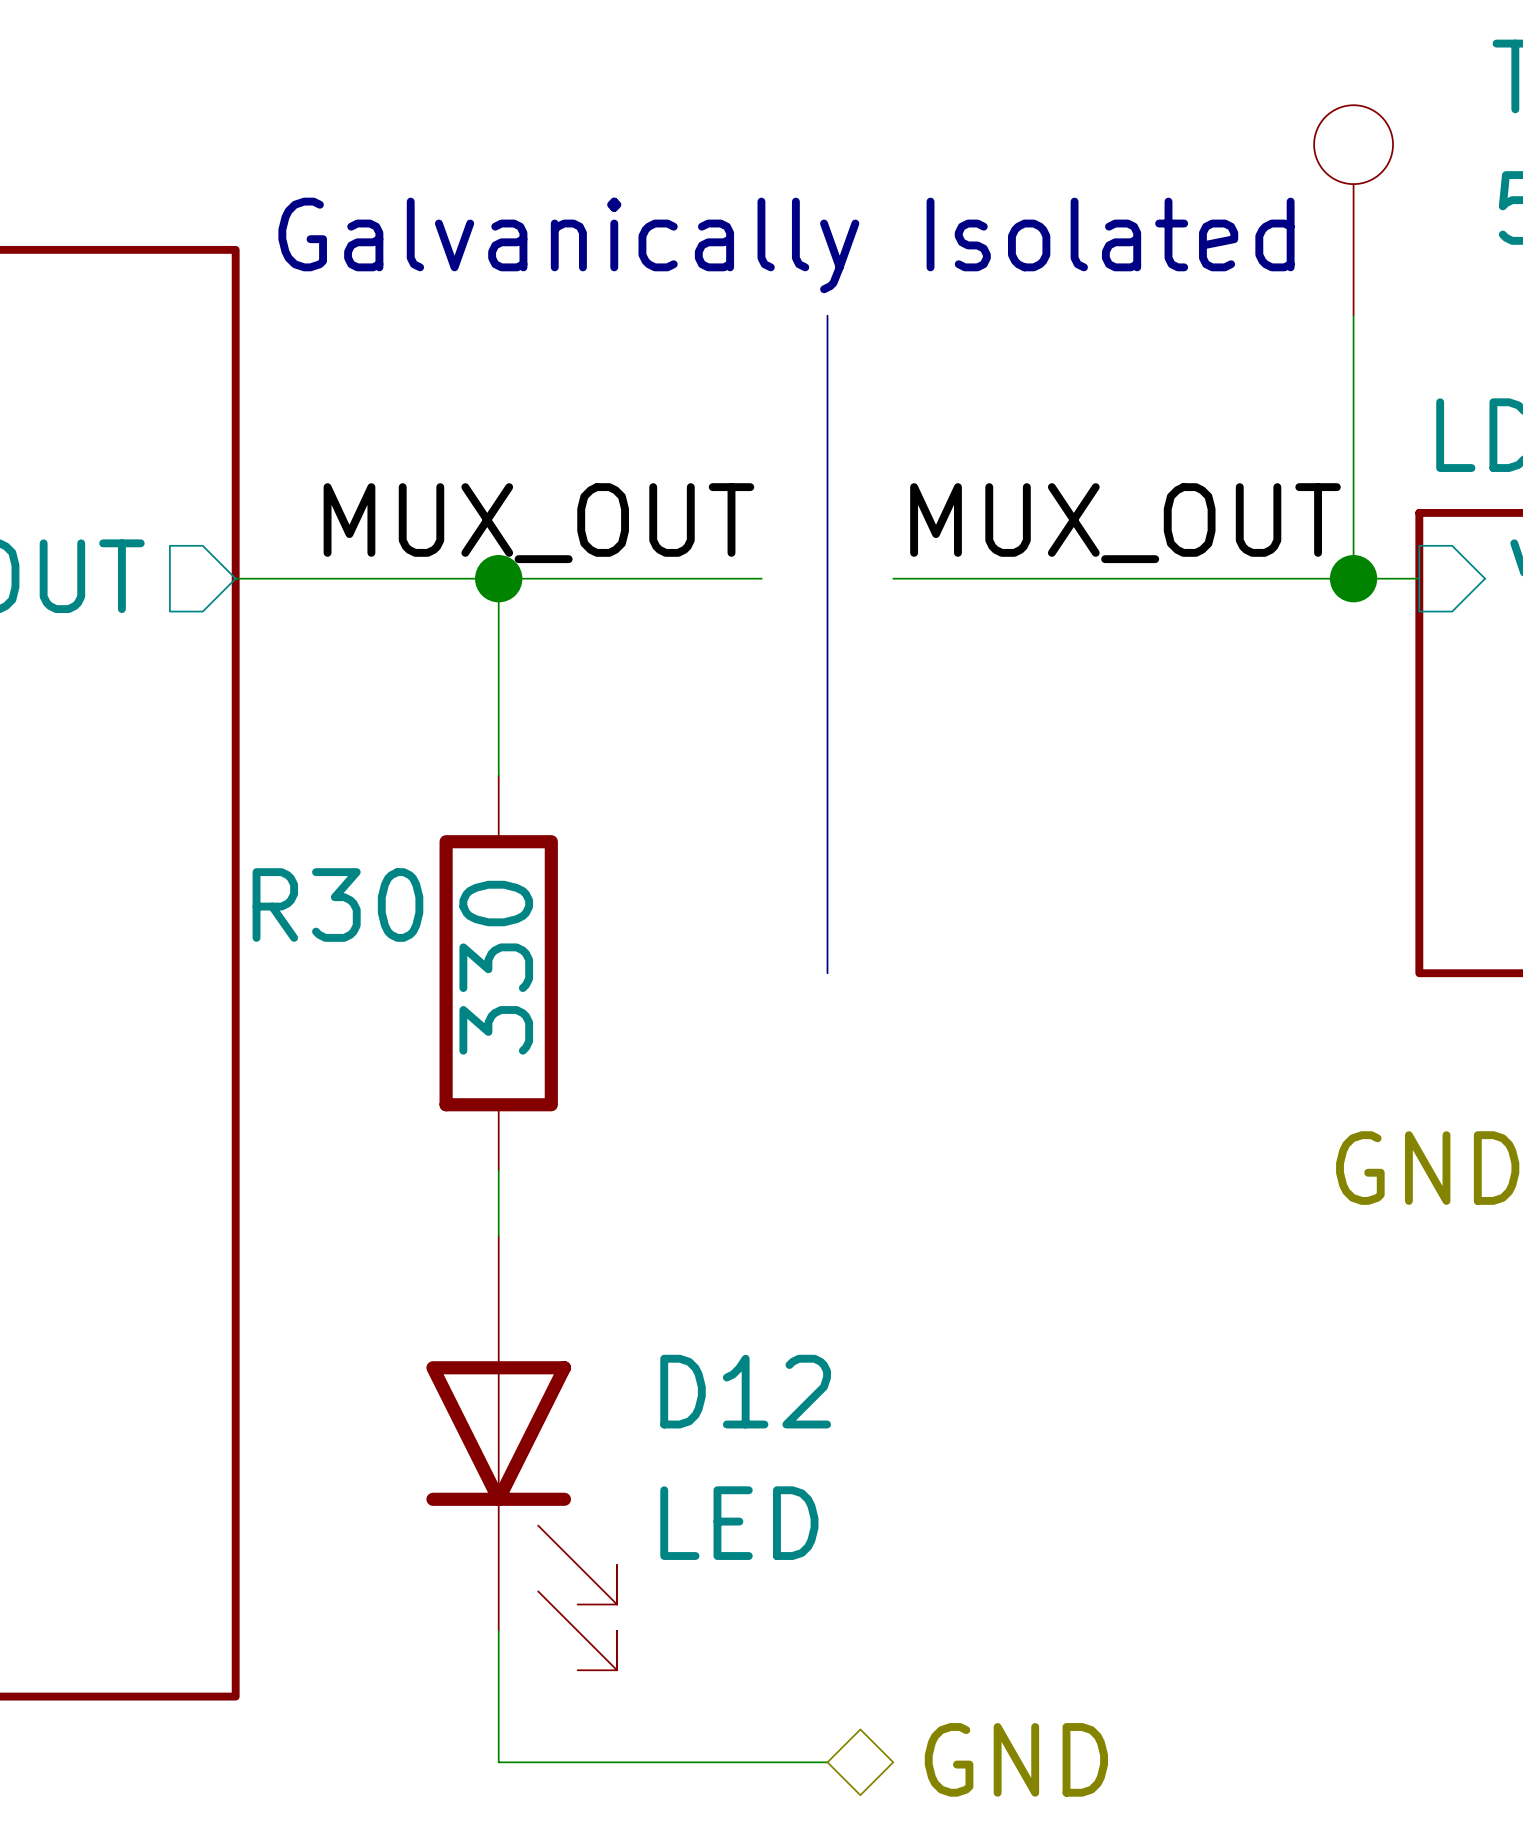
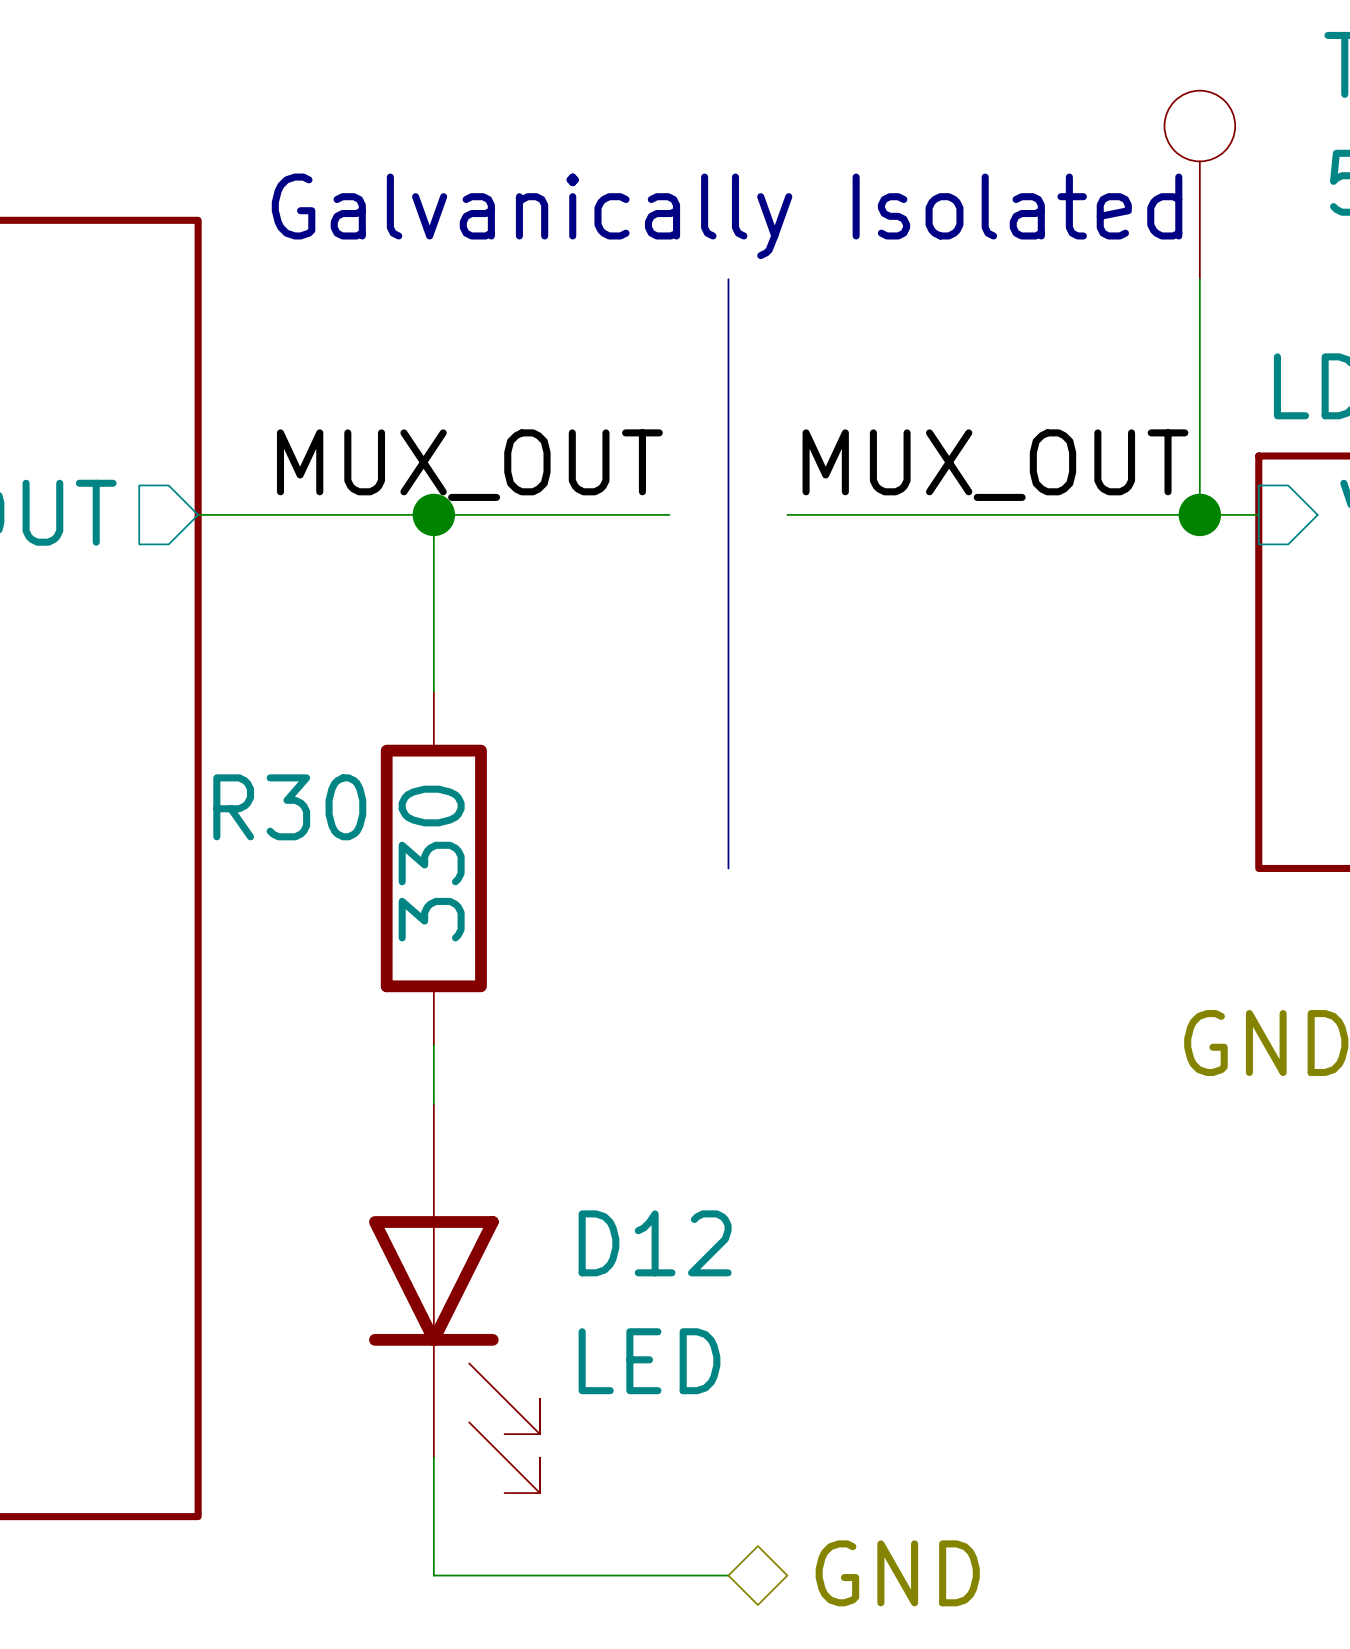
text position: Galvanically Isolated (786, 245) -> Galvanically Isolated (727, 216)

